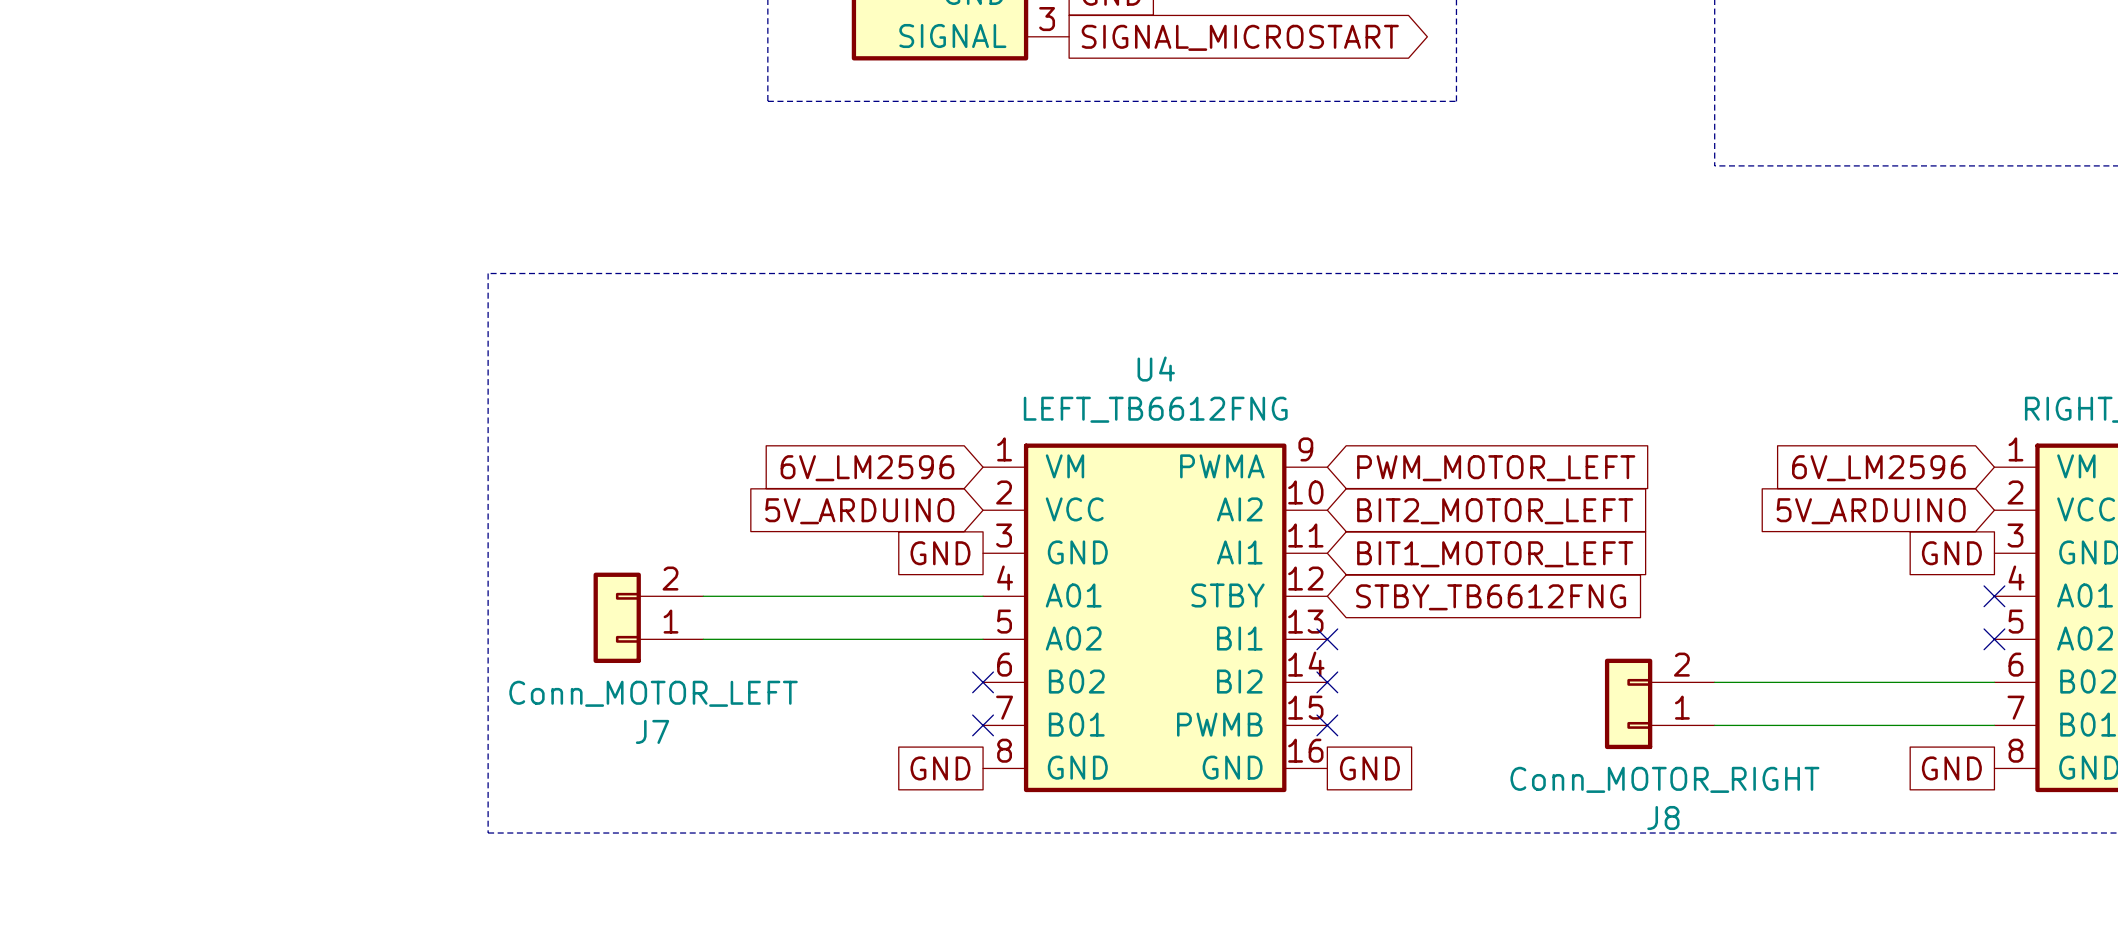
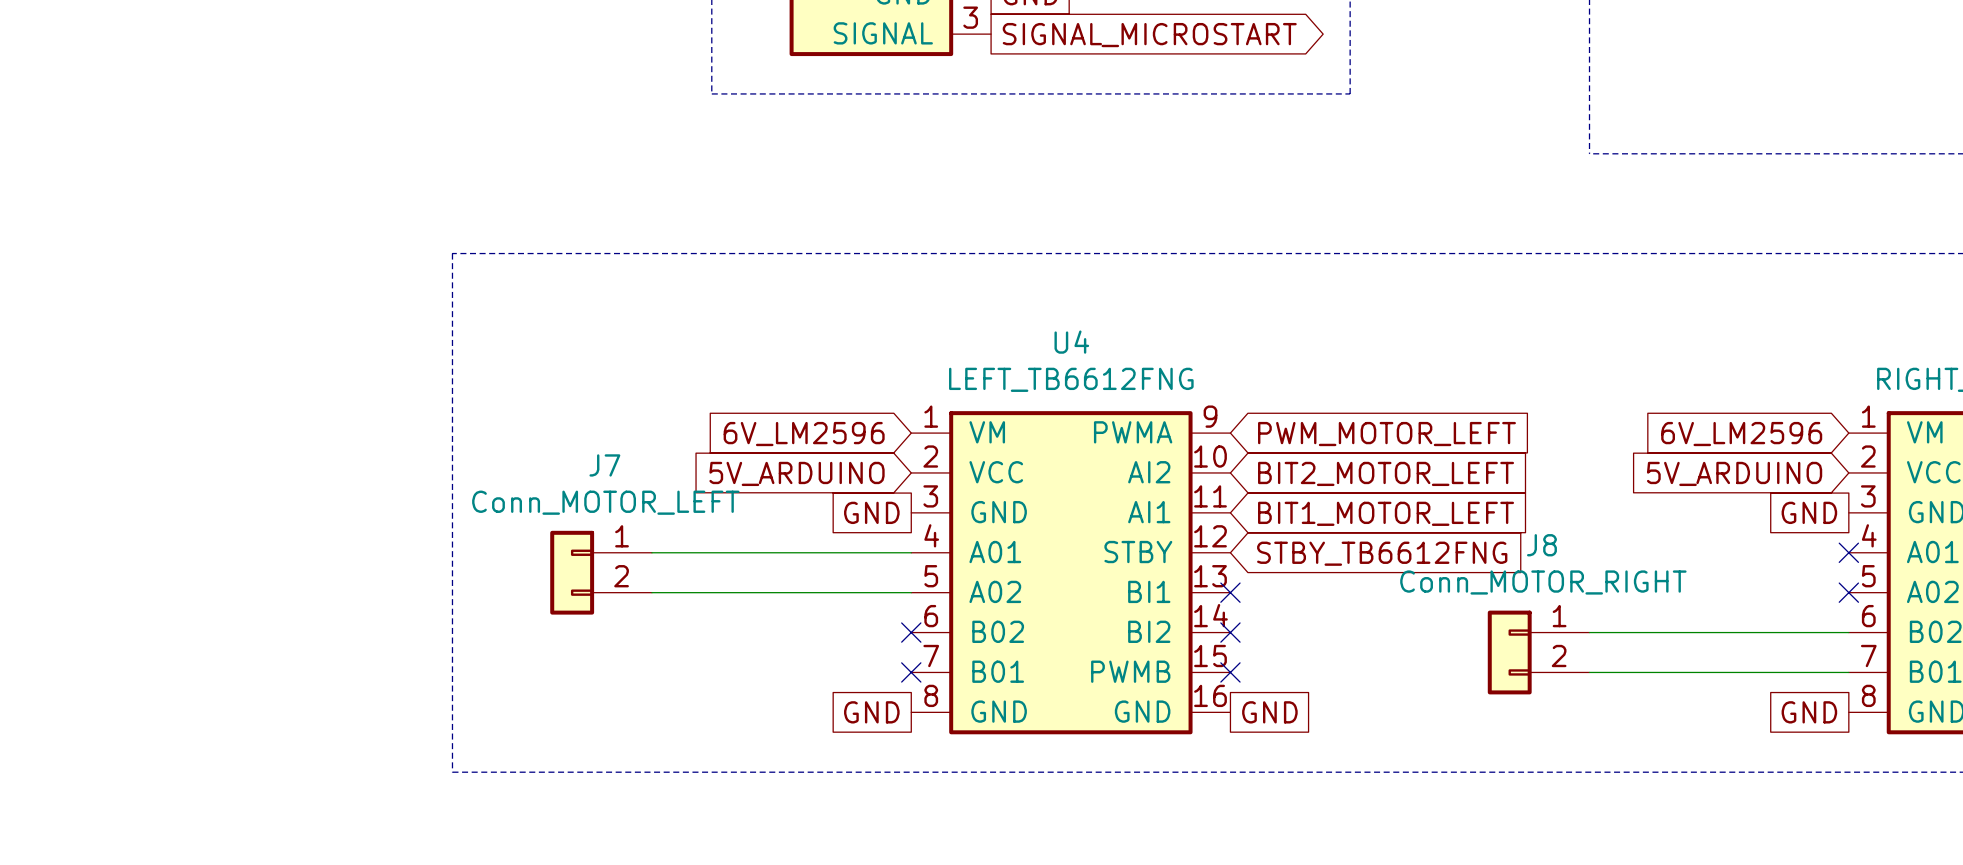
J7 flip: as is (617, 617) -> up-down (572, 572)
J8 flip: as is (1628, 703) -> up-down (1509, 652)

